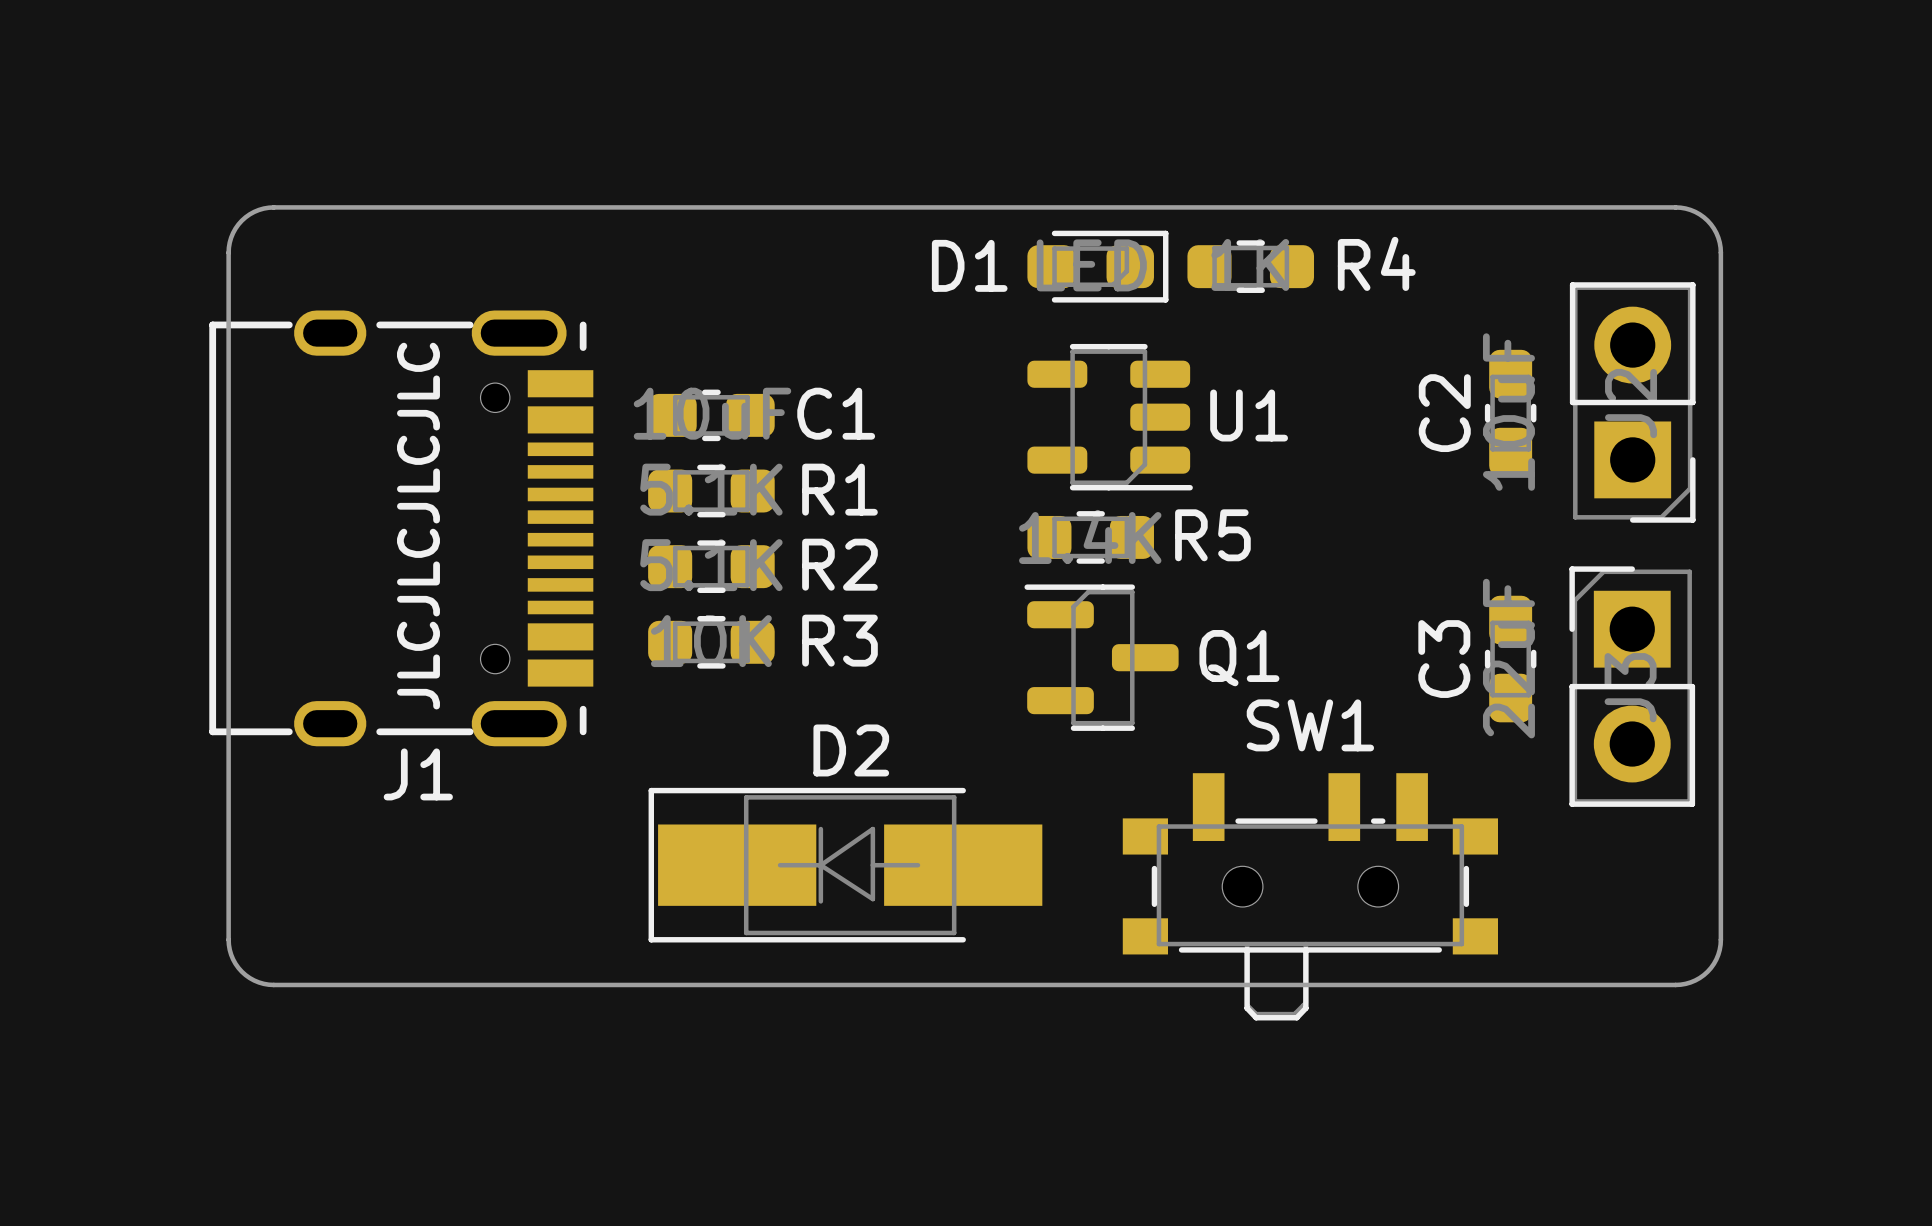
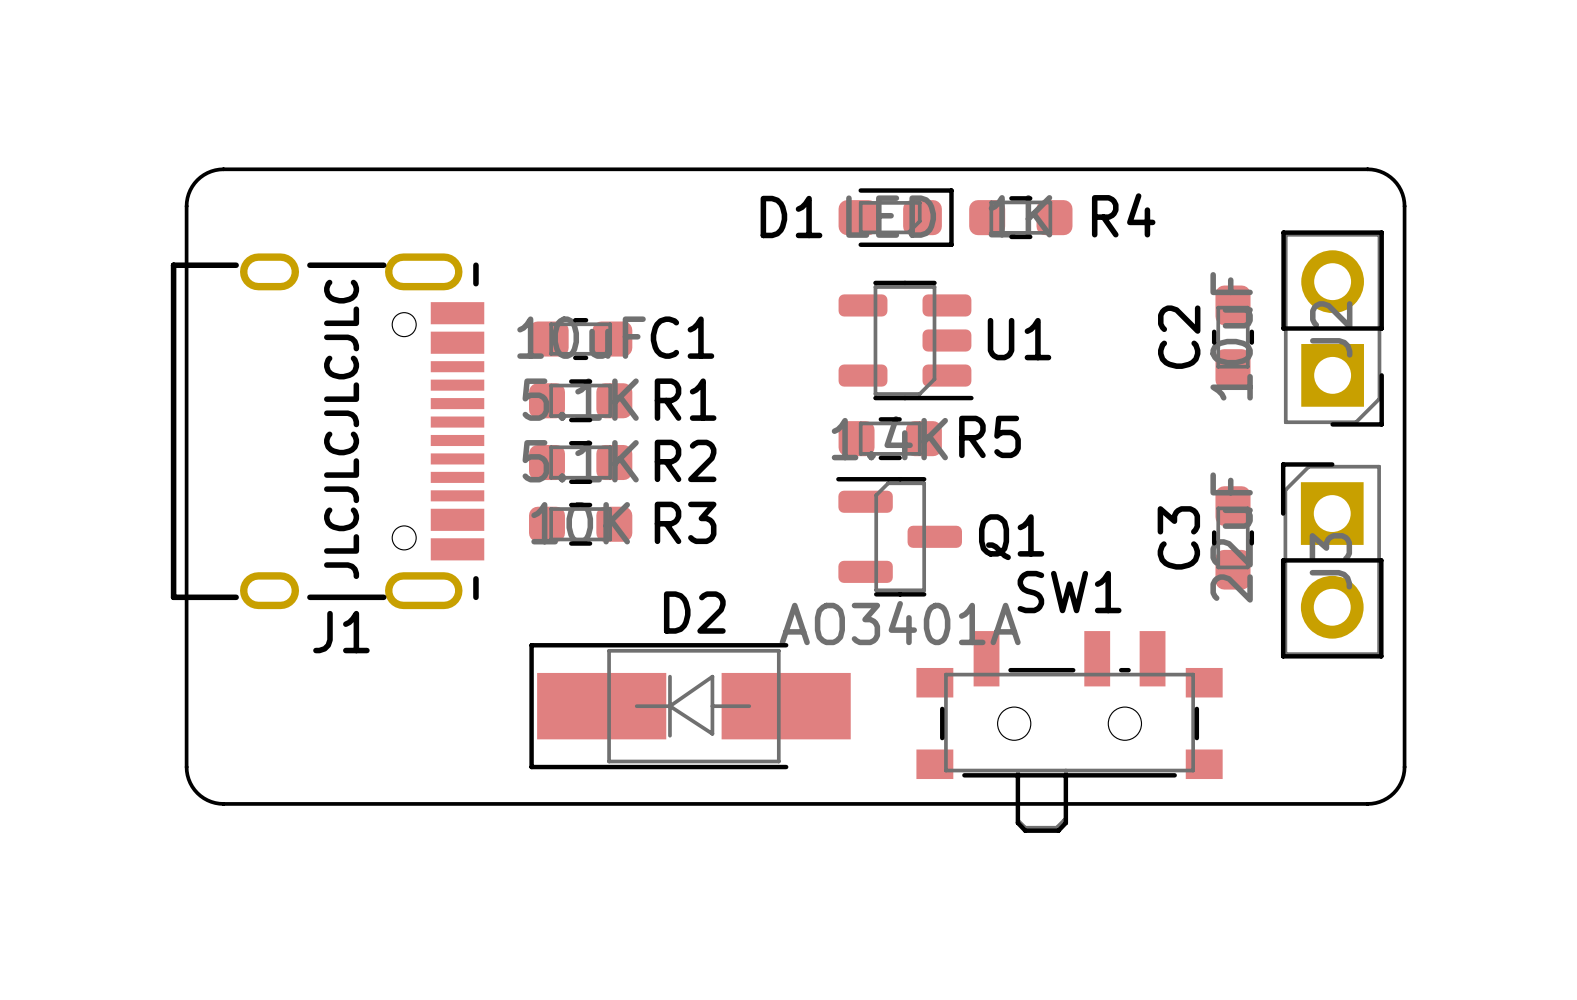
Q1 value: none -> AO3401A (900, 623)

